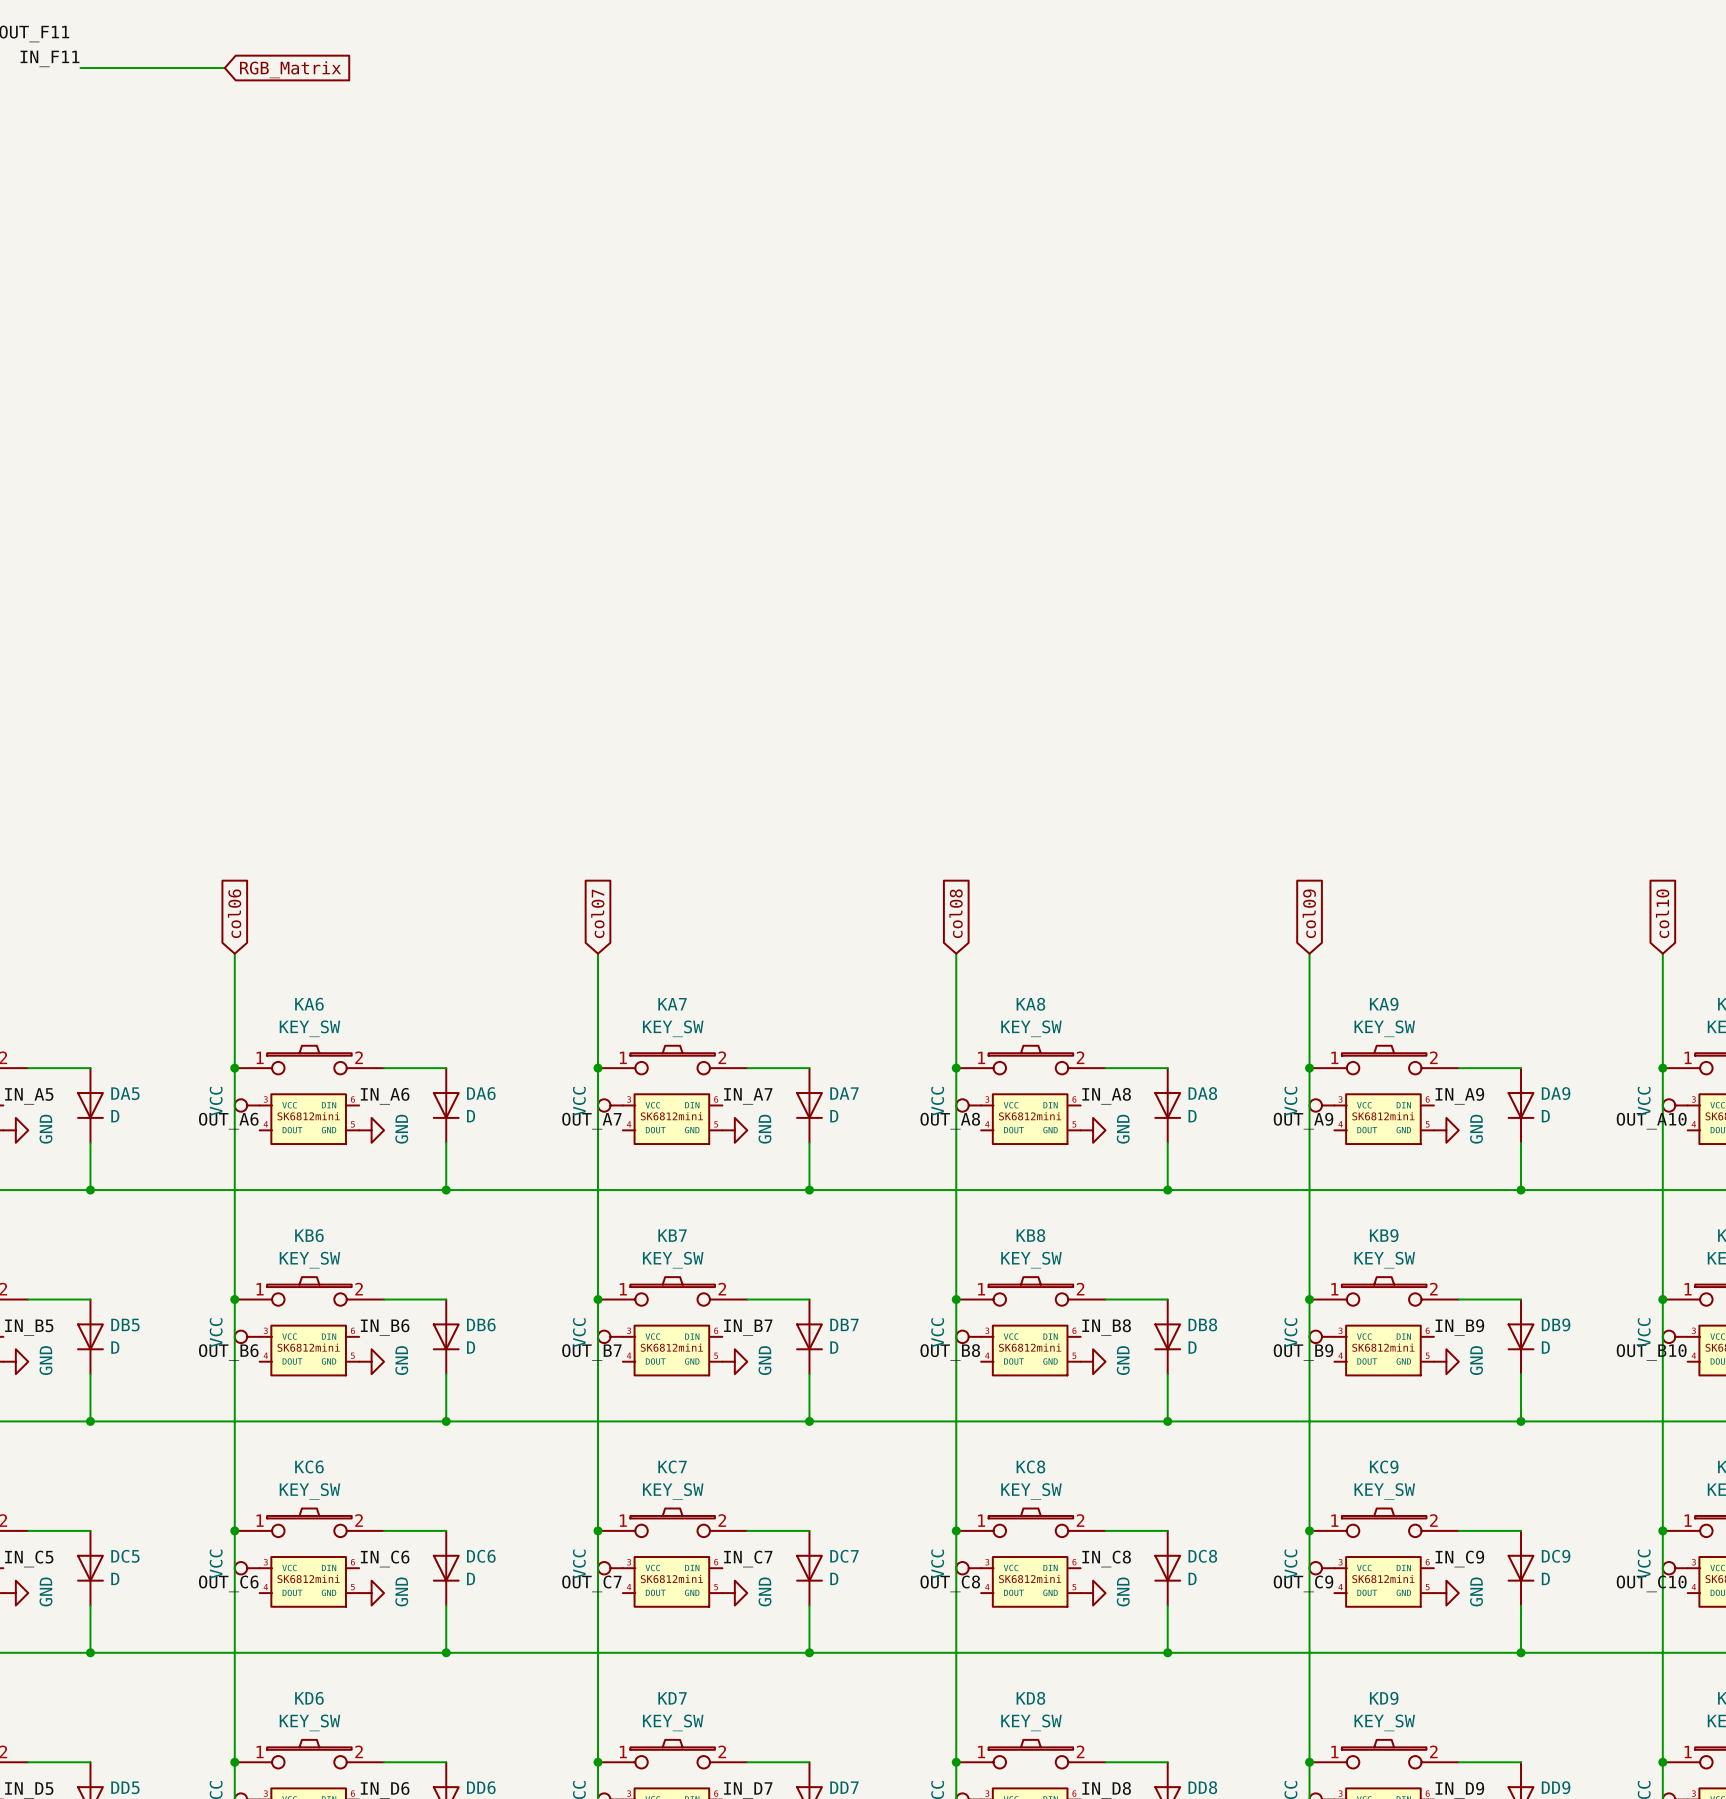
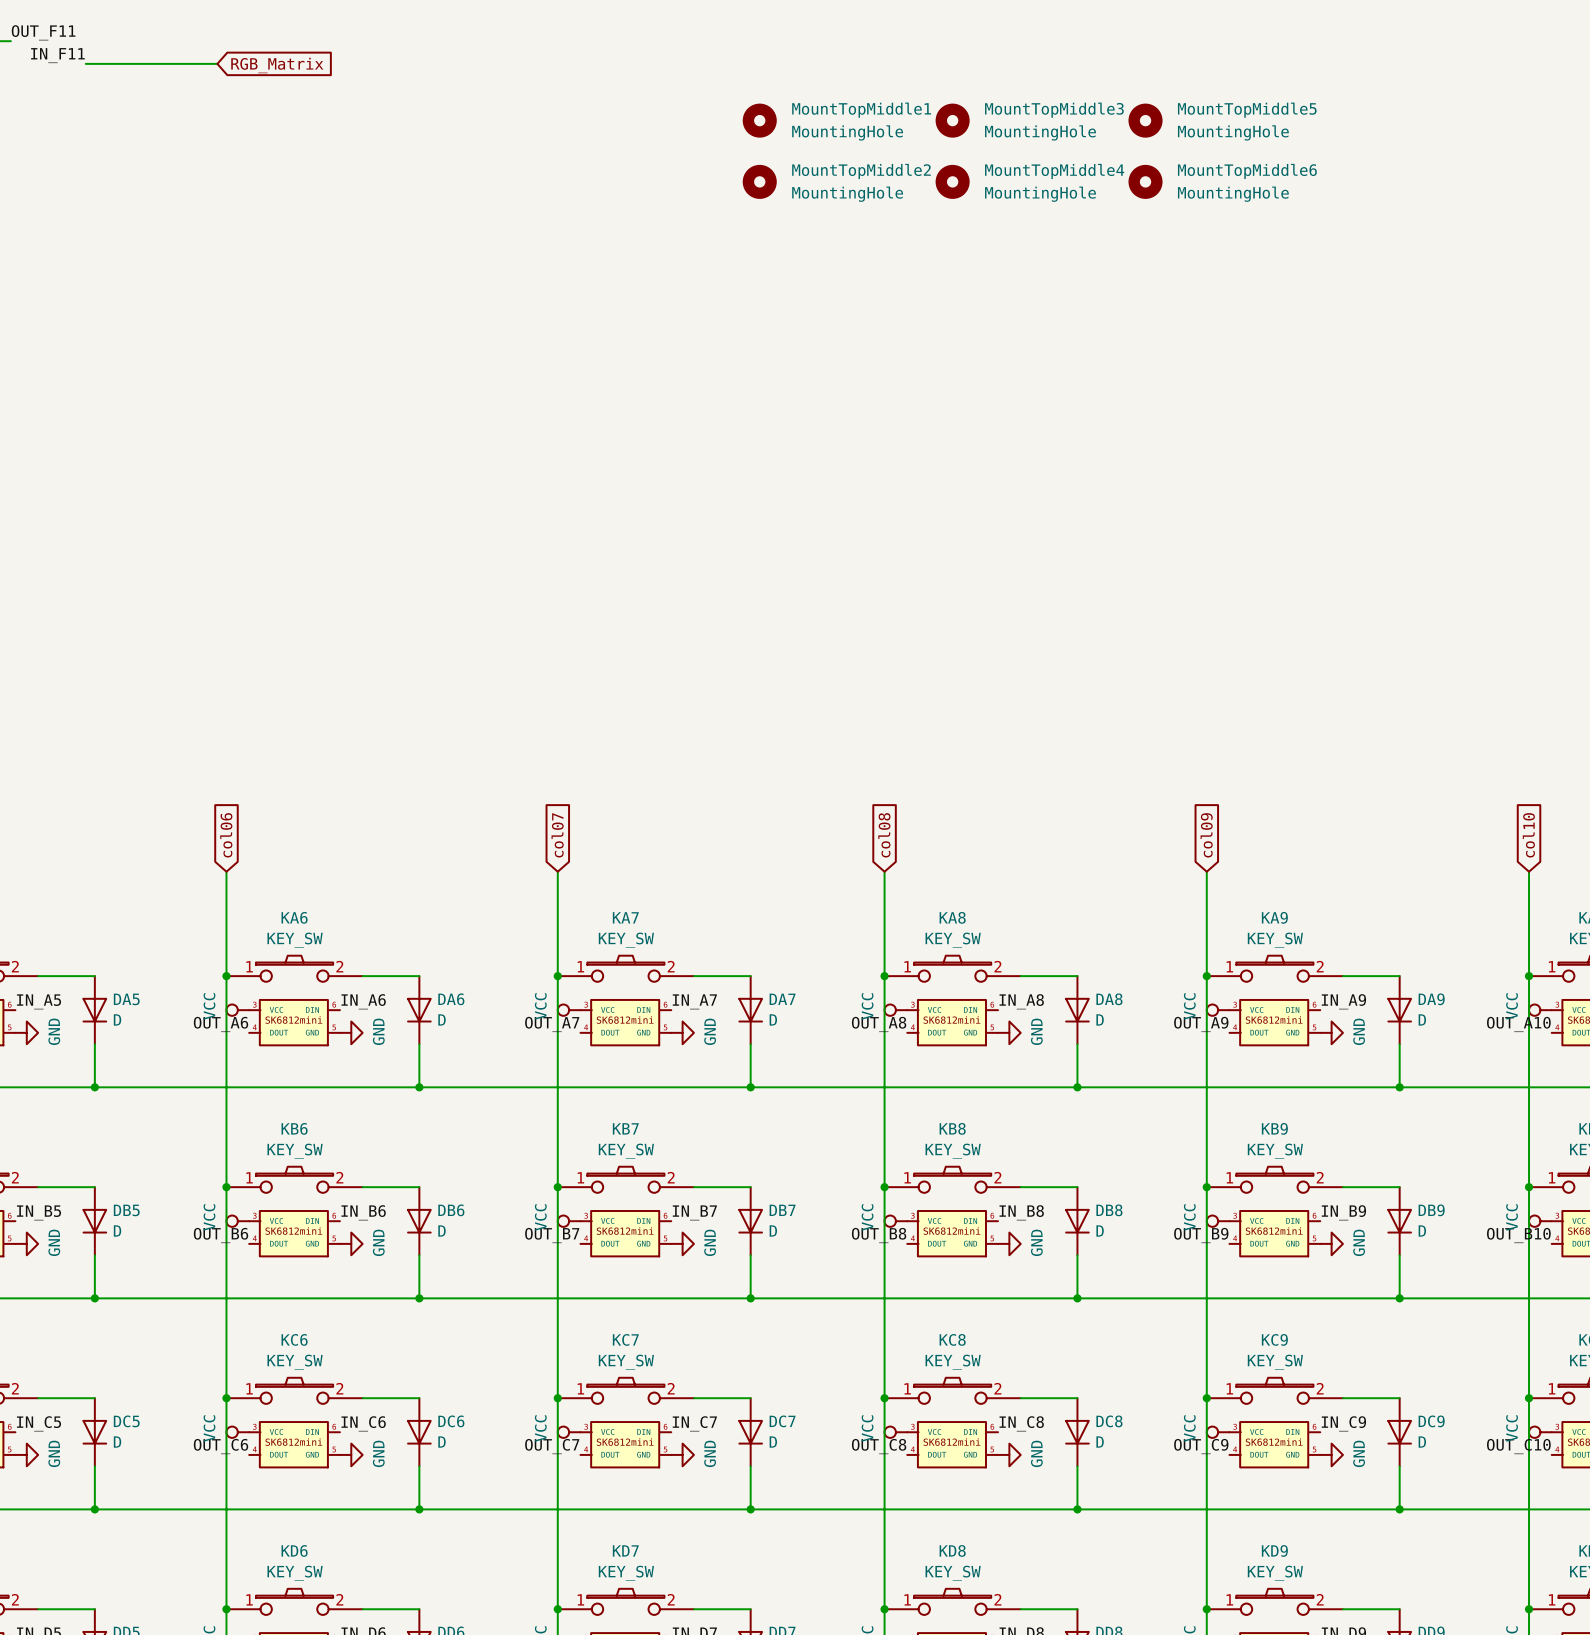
MountTopMiddle1: none -> MountingHole (759, 120)
MountTopMiddle3: none -> MountingHole (952, 120)
MountTopMiddle5: none -> MountingHole (1145, 120)
MountTopMiddle2: none -> MountingHole (759, 181)
MountTopMiddle4: none -> MountingHole (952, 181)
MountTopMiddle6: none -> MountingHole (1145, 181)

